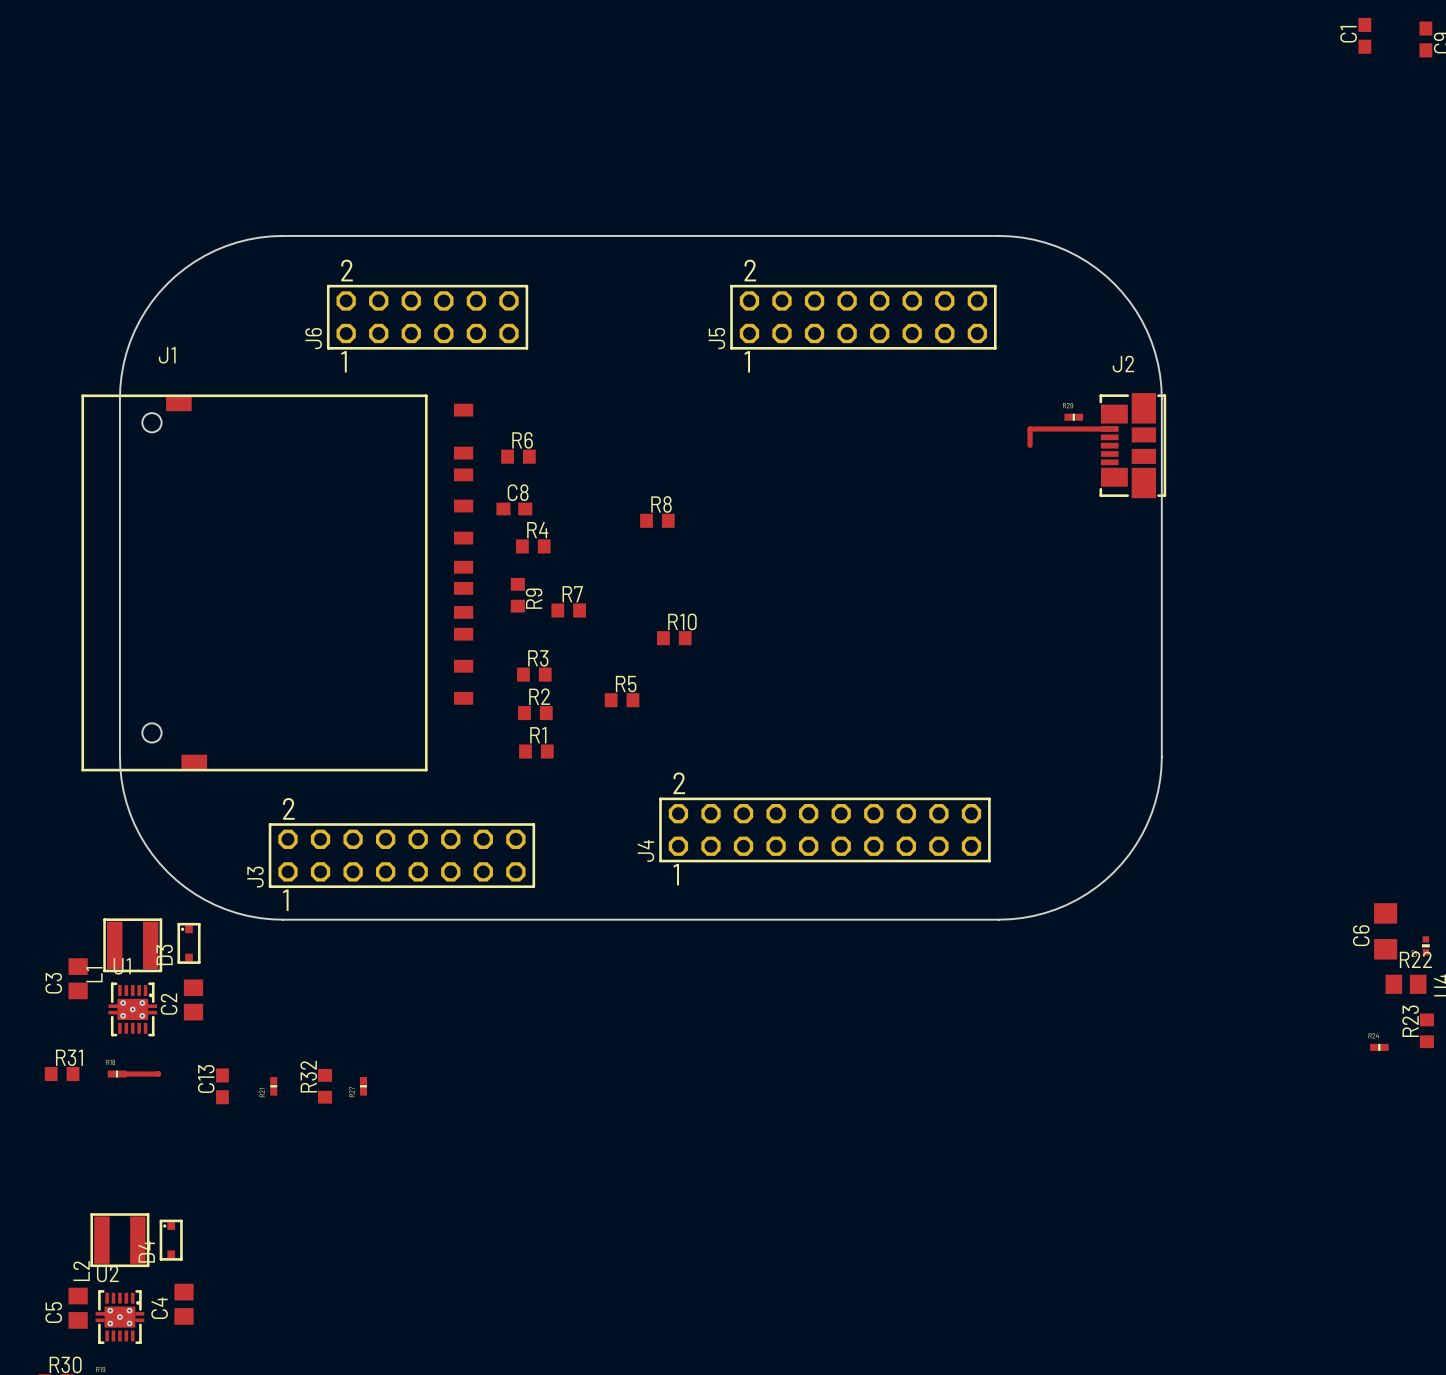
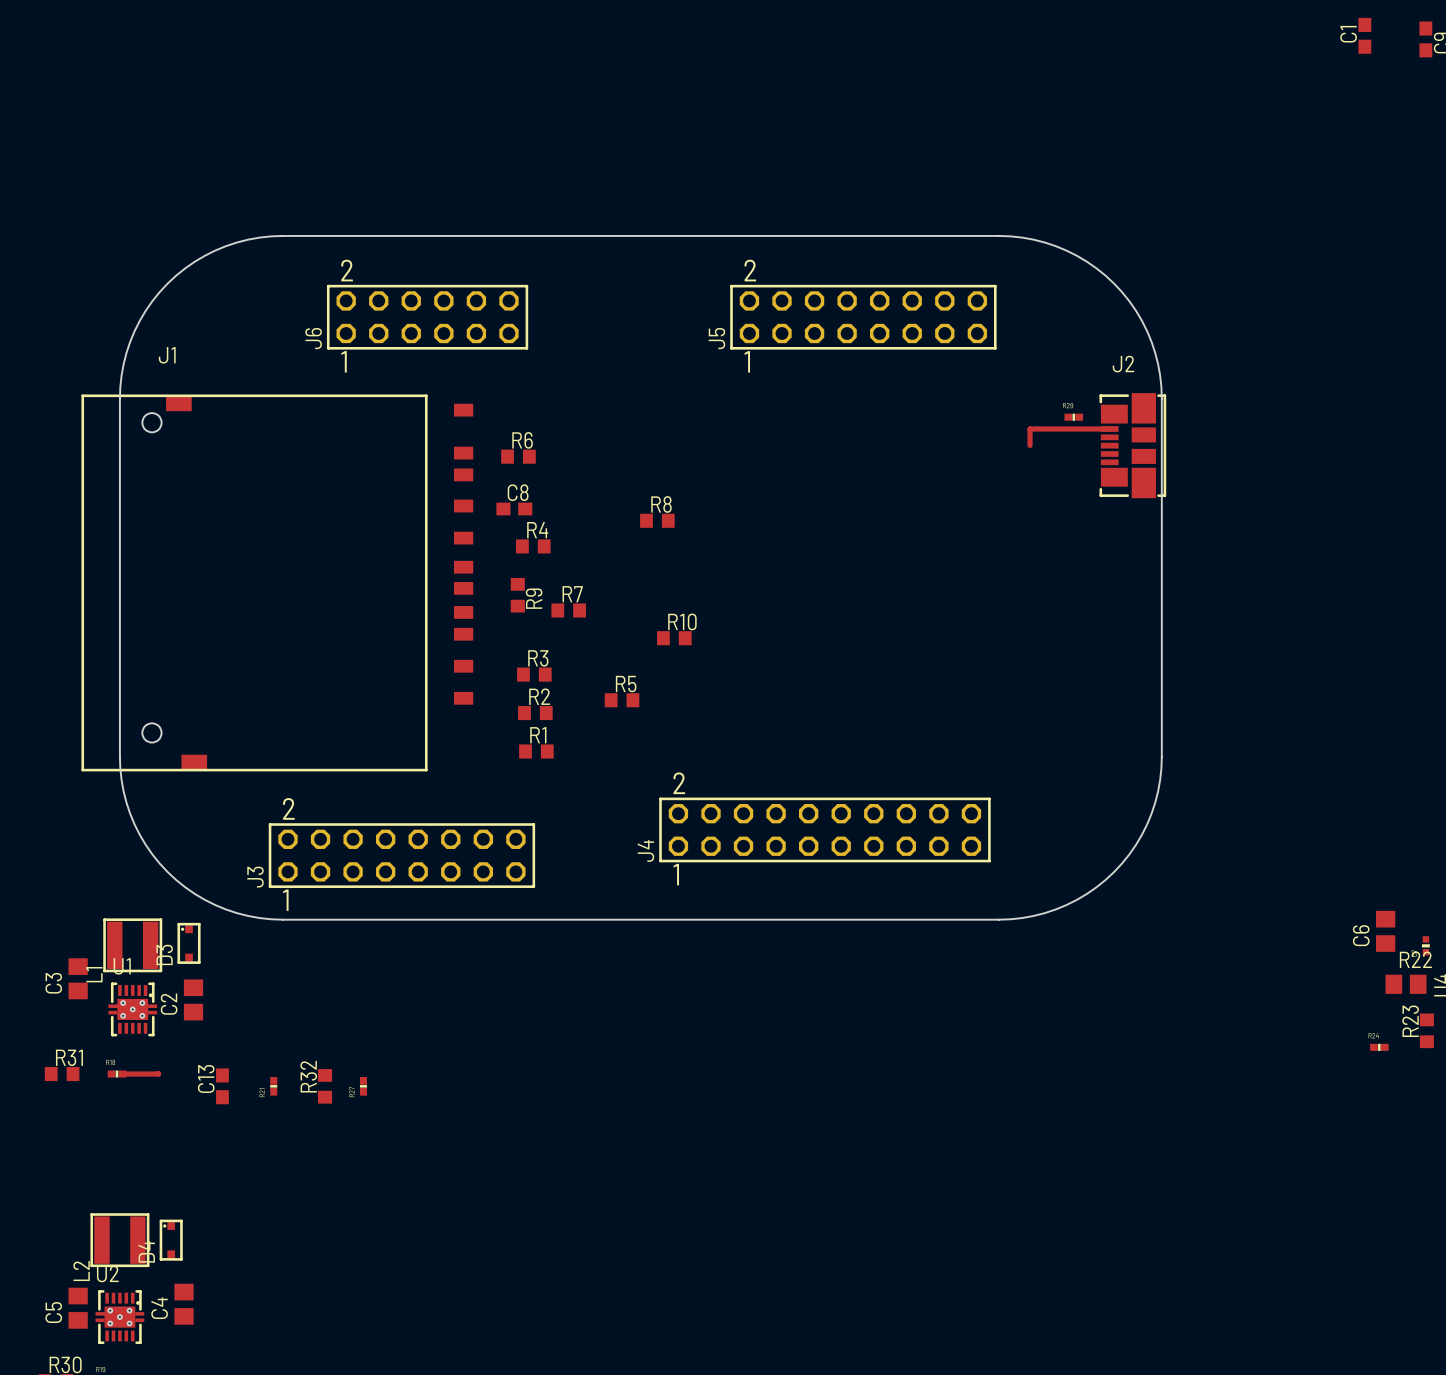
C6 footprint: [1374, 903, 1398, 960] -> [1376, 910, 1396, 952]

